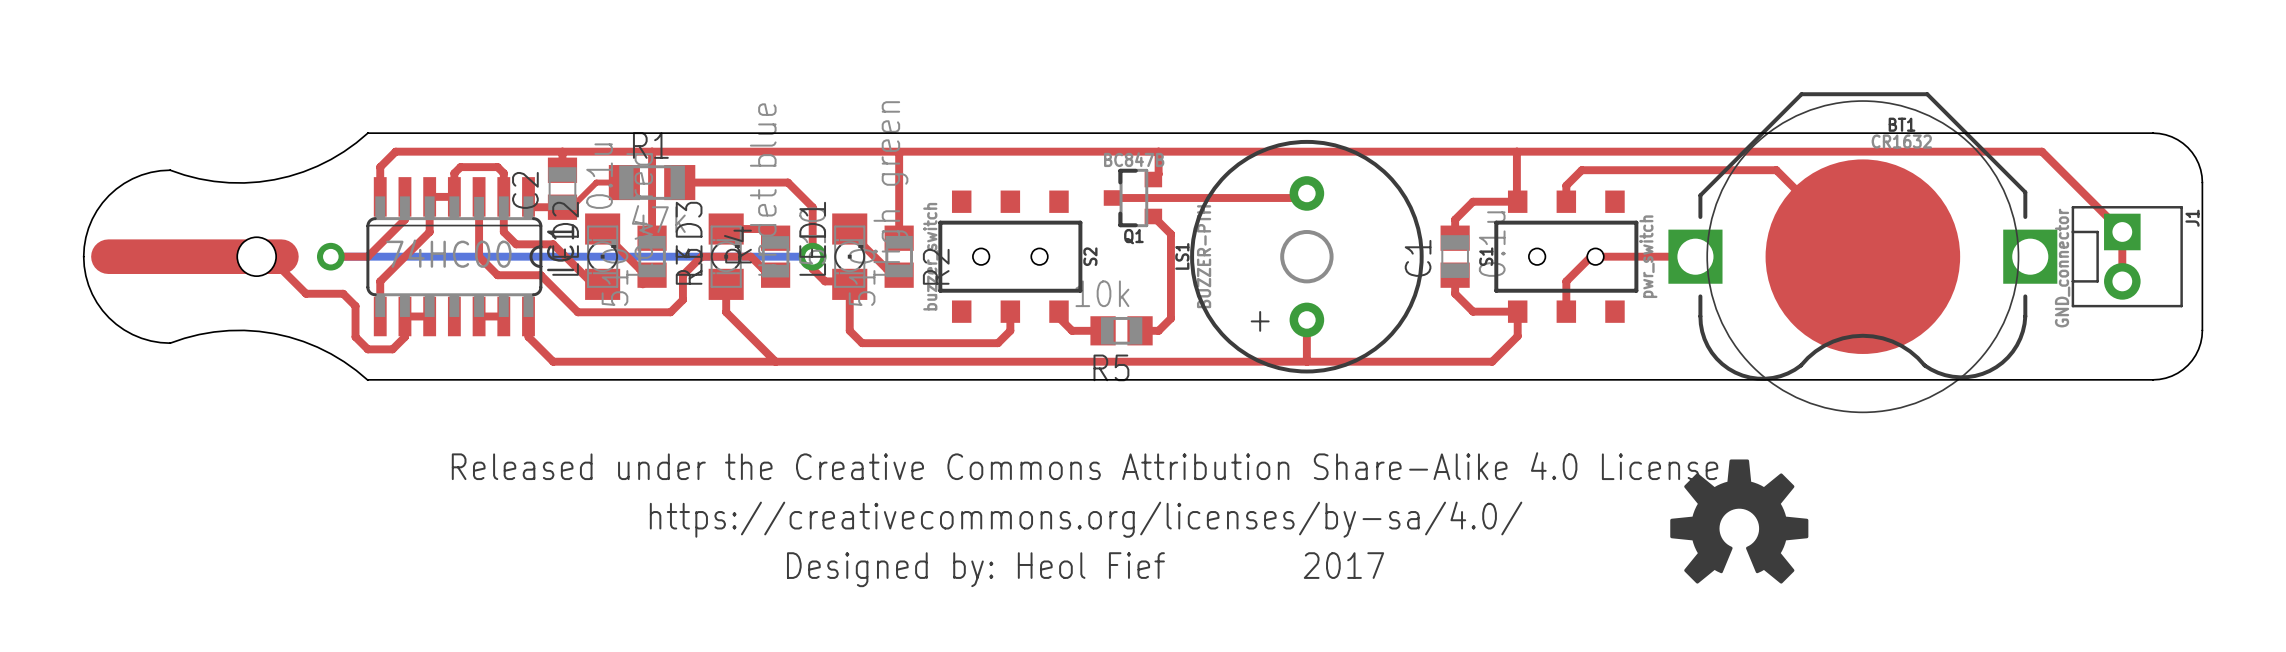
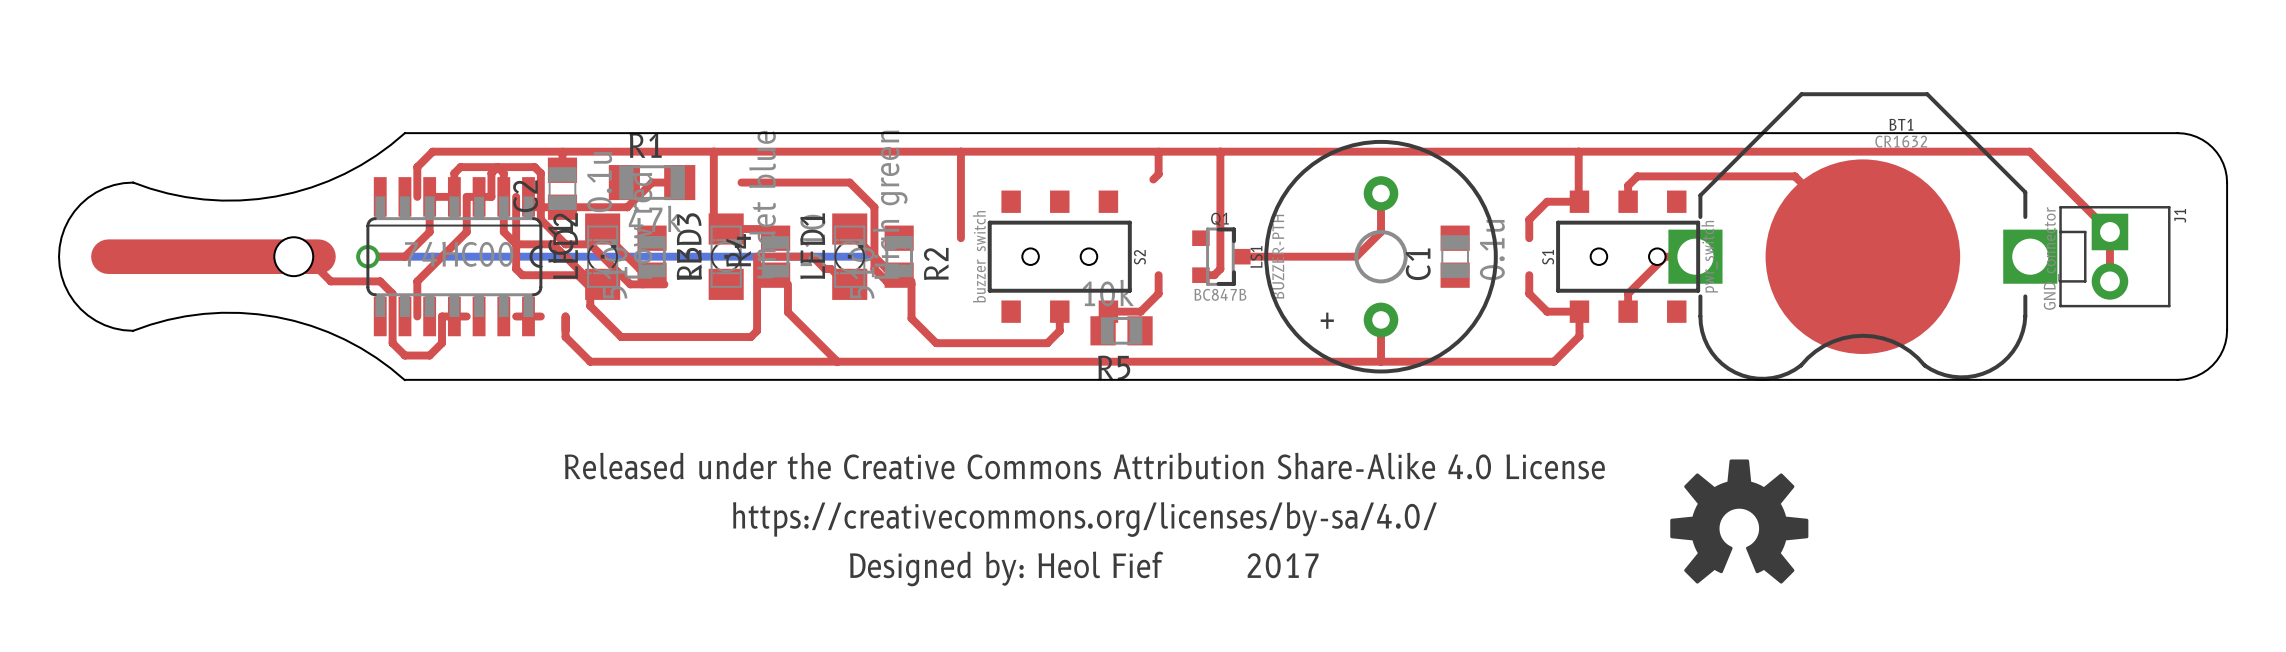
drawing: [1706, 100, 2019, 413] -> none
board edge: (404, 133) (367, 133) (331, 159) (303, 171) (274, 179) (229, 182) (199, 178) (170, 170) (141, 175) (124, 183) (102, 202) (88, 228) (84, 247) (85, 275) (96, 302) (109, 317) (132, 334) (150, 341) (170, 343) (199, 334) (229, 330) (274, 333) (303, 341) (331, 353) (367, 380) -> (404, 133) (376, 155) (344, 173) (311, 187) (276, 196) (239, 200) (203, 199) (167, 193) (133, 182) (104, 188) (88, 197) (68, 219) (61, 237) (59, 256) (61, 275) (68, 293) (88, 315) (104, 325) (133, 330) (167, 319) (203, 313) (239, 312) (276, 316) (311, 325) (344, 339) (376, 357) (404, 380)
board edge: (2152, 133) (2171, 136) (2187, 147) (2198, 163) (2202, 182) (2202, 330) (2200, 343) (2192, 360) (2183, 369) (2165, 378) (2152, 379) -> (2152, 133) (2184, 133) (2202, 139) (2212, 147) (2220, 157) (2225, 169) (2227, 182) (2227, 330) (2223, 349) (2212, 365) (2196, 376) (2184, 379) (2152, 379)
top track: (432, 151) (395, 151) (380, 167) (380, 196) -> (432, 151) (417, 167) (417, 196)
top track: (652, 151) (652, 238) -> (713, 151) (713, 238)
top track: (899, 151) (899, 238) -> (960, 151) (960, 238)
top track: none -> (1220, 151) (1220, 269) (1214, 275) (1200, 275)
top track: (1516, 151) (1517, 201) (1473, 201) (1455, 219) (1455, 238) -> none
top track: none -> (1578, 151) (1579, 201) (1547, 201) (1529, 219) (1529, 238)
top track: (2029, 151) (2042, 151) (2122, 231) (2122, 281) -> (2029, 151) (2109, 231) (2109, 281)
top track: (624, 182) (596, 182) (571, 207) -> (679, 182) (652, 182) (627, 207) (571, 207)
top track: (686, 182) (741, 182) -> none
top track: (787, 182) (812, 207) (812, 269) (825, 281) (846, 281) (849, 284) -> (787, 182) (849, 182) (874, 207) (874, 269) (886, 281) (908, 281) (911, 284)
top track: (1306, 193) (1302, 198) (1112, 198) -> none
top track: none -> (1381, 193) (1381, 231) (1356, 256) (1241, 256)
top track: (404, 196) (404, 219) (367, 256) (330, 256) -> none
top track: (479, 196) (479, 256) (497, 275) (522, 275) -> (516, 196) (516, 269) (522, 275)
Q1 rotation: 0° (1132, 198) -> 180° (1221, 256)
Q1 position: (1132, 198) -> (1221, 256)
top track: (1566, 201) (1566, 185) (1581, 170) (1776, 170) (1862, 256) -> none
top track: none -> (1628, 201) (1628, 185) (1637, 176) (1794, 176) (1875, 256)
top track: (1153, 216) (1170, 234) (1170, 318) (1158, 330) (1140, 330) -> none
hole position: (256, 256) -> (293, 256)
top track: (281, 256) (281, 269) (306, 293) (343, 293) (355, 306) (355, 337) (367, 349) (392, 349) (404, 337) (404, 316) (429, 316) -> (281, 256) (318, 256) (318, 269) (330, 281) (380, 281) (392, 293) (392, 343) (404, 355) (429, 355) (442, 343) (442, 316) (466, 316)
via: (330, 256) -> none
via: none -> (367, 256)
top track: (404, 256) (380, 281) (380, 316) -> (404, 256) (367, 256)
bottom track: none -> (812, 256) (874, 256)
via: (812, 256) -> none
S2 position: (1010, 256) -> (1059, 256)
LS1 position: (1306, 256) -> (1381, 256)
S1 position: (1566, 256) -> (1628, 256)
top track: (1665, 256) (1591, 256) (1566, 281) (1566, 311) -> (1665, 256) (1628, 293) (1628, 311)
J1 position: (2127, 256) -> (2114, 256)
top track: (540, 275) (577, 312) (670, 312) (682, 299) (682, 275) (701, 256) (750, 256) (763, 269) (769, 269) (775, 275) -> (540, 275) (577, 275) (590, 287) (590, 306) (621, 337) (750, 337) (757, 330) (757, 256) (812, 256) (825, 269) (831, 269) (837, 275)
top track: none -> (1158, 275) (1158, 293) (1140, 311) (1108, 311)
top track: (1455, 275) (1455, 293) (1473, 311) (1517, 311) (1517, 336) (1492, 361) -> (1529, 275) (1529, 293) (1547, 311) (1579, 311) (1579, 336) (1553, 361) (1492, 361)
top track: (849, 281) (849, 330) (862, 343) (936, 343) -> (911, 281) (911, 318) (936, 343)
top track: none -> (664, 284) (630, 284) (590, 244) (565, 244) (540, 219) (540, 173) (534, 167) (497, 167) (491, 173) (491, 196) (466, 196) (466, 231) (417, 281) (417, 316)
top track: (726, 284) (726, 312) (775, 361) -> (787, 284) (787, 312) (837, 361)
top track: (1010, 311) (1010, 330) (998, 343) -> (1059, 311) (1059, 330) (1047, 343) (998, 343)
top track: (1058, 311) (1058, 317) (1072, 330) (1103, 330) -> none
top track: (479, 316) (503, 316) -> (516, 316) (540, 316)
top track: (528, 316) (528, 337) (553, 361) (590, 361) -> (565, 316) (565, 337) (590, 361)
top track: (1306, 319) (1306, 361) -> (1381, 319) (1381, 361)
text position: + (1260, 321) -> + (1327, 320)
board edge: (367, 379) (404, 379) -> none

